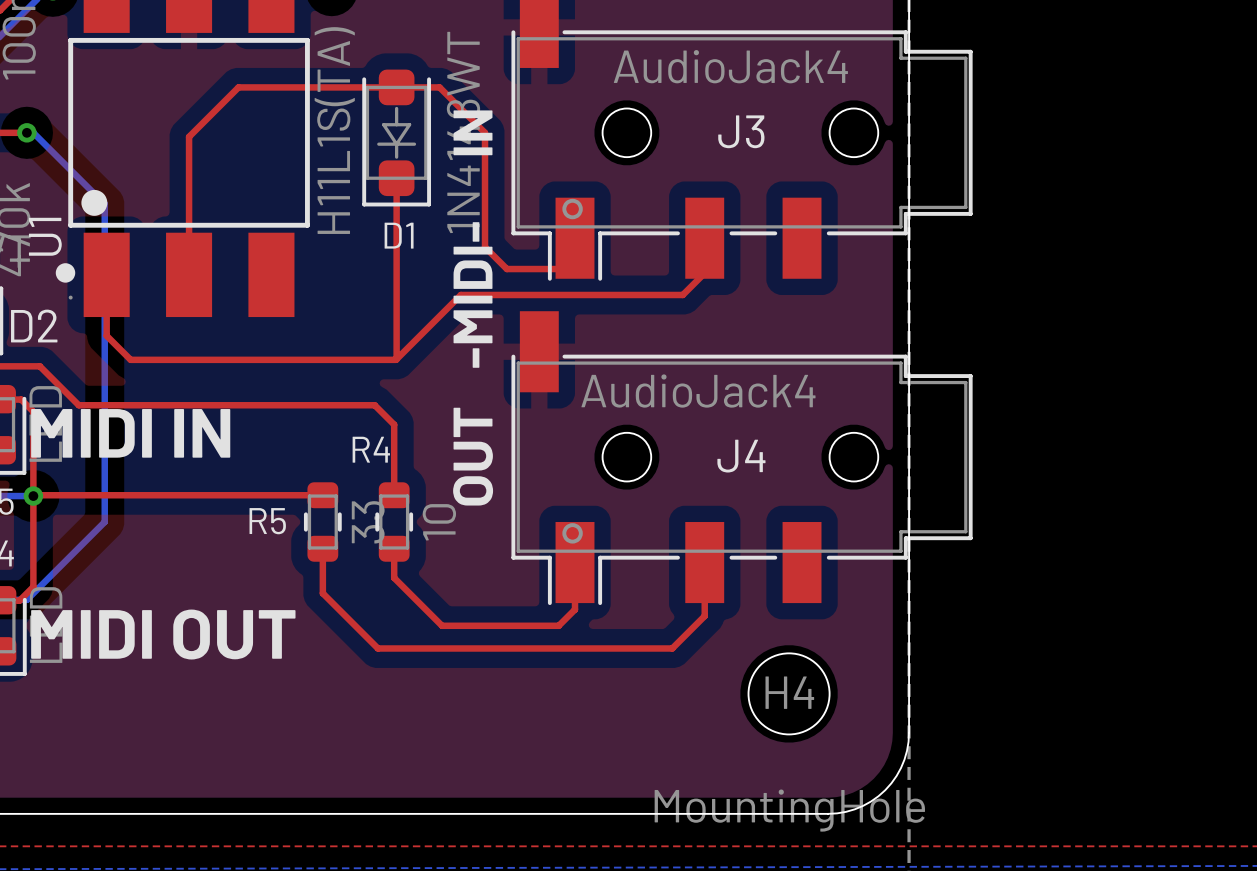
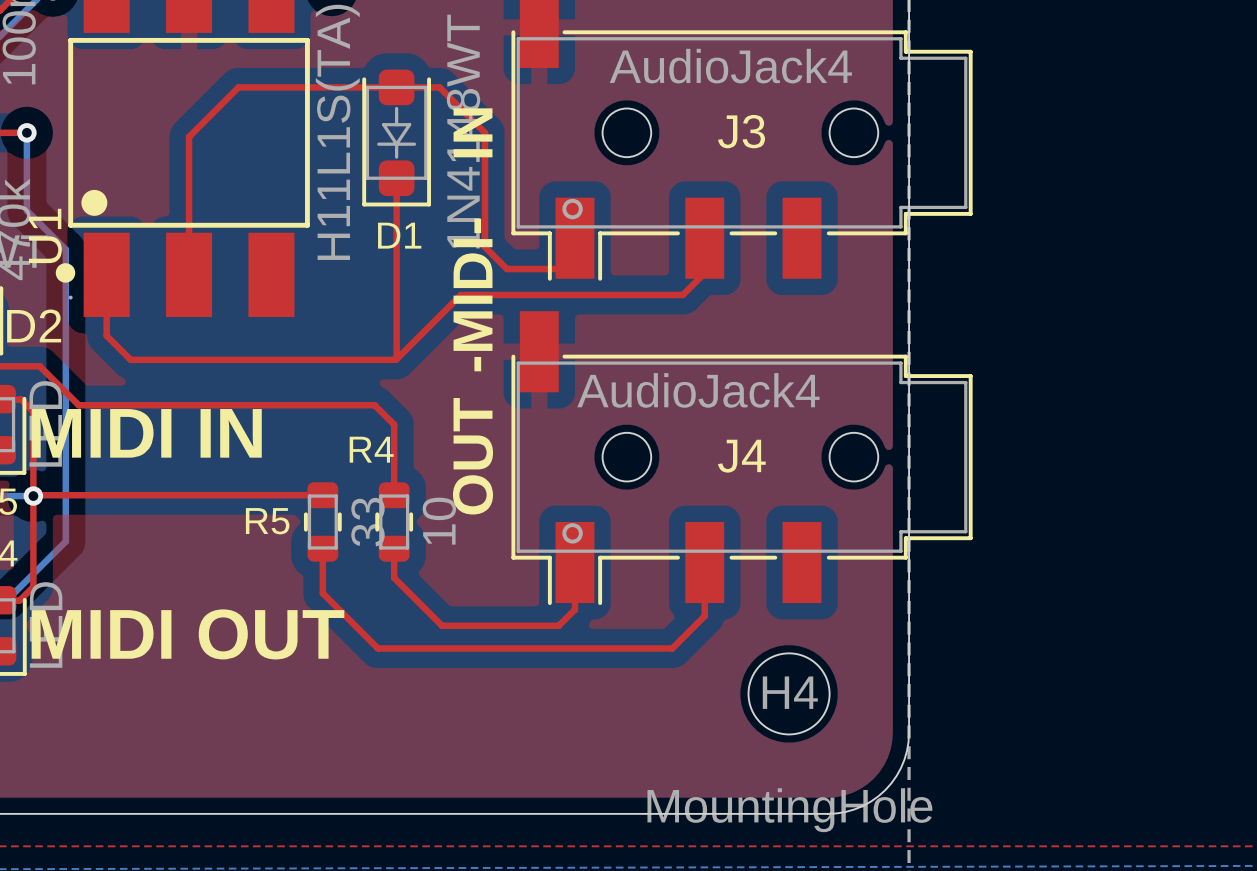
bottom track: (26, 132) (33, 132) (104, 204) (104, 522) (26, 599) (7, 599) -> (26, 132) (26, 210) (65, 249) (65, 541) (7, 599)

